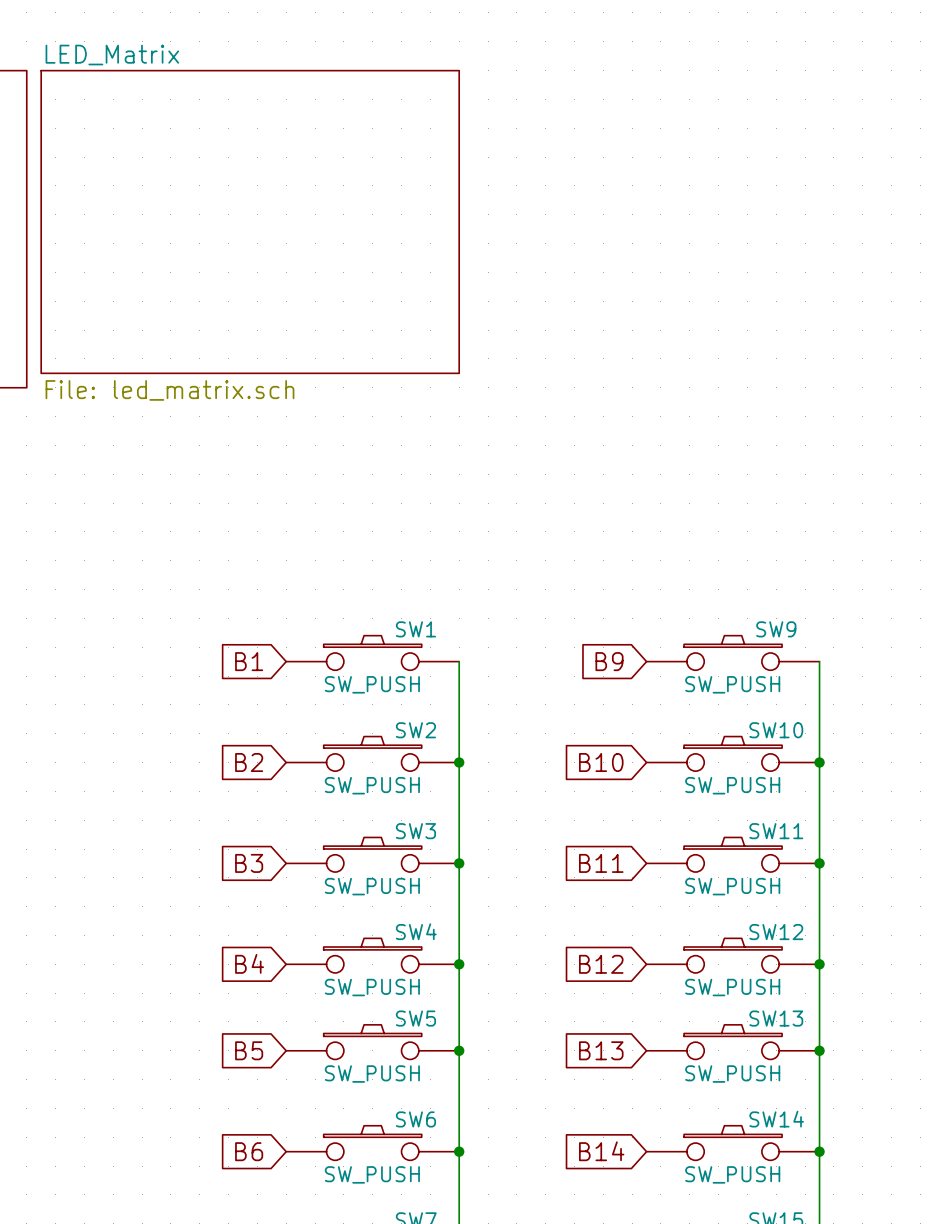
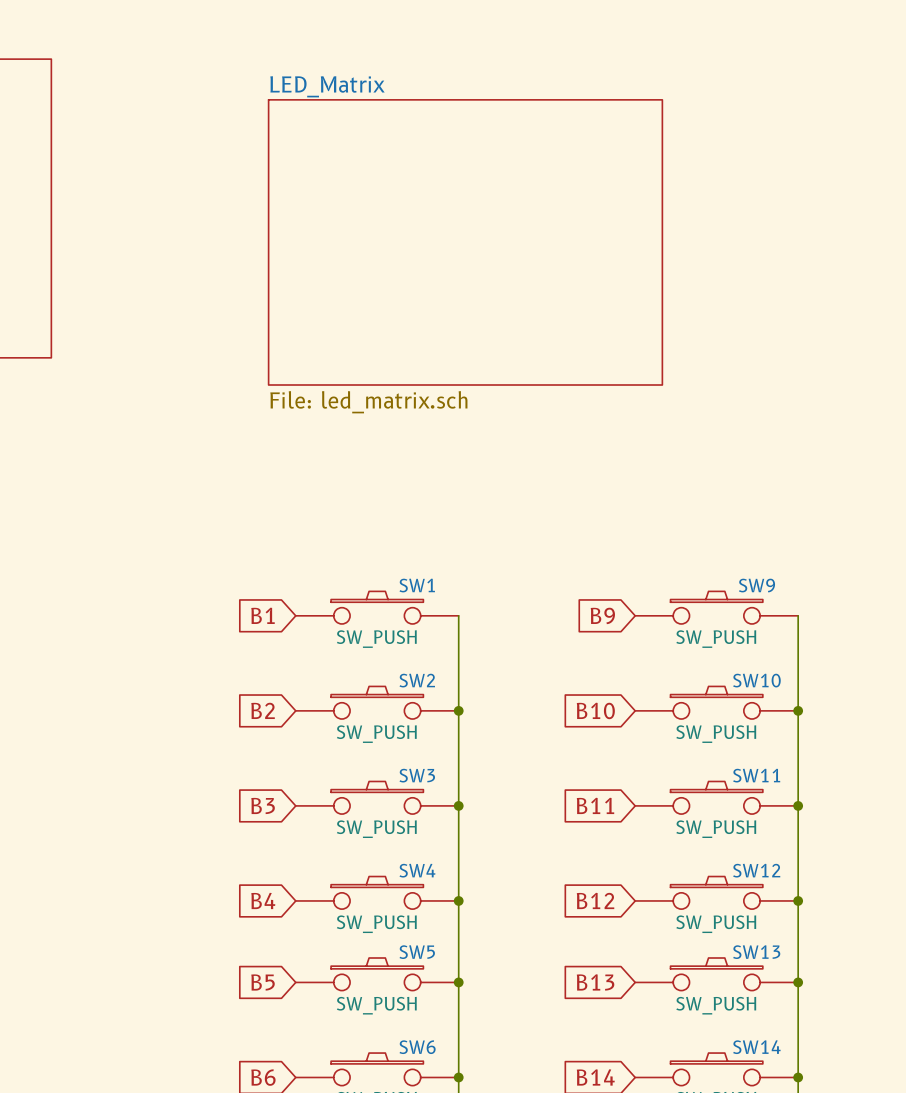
sheet LED_Matrix position: (250, 221) -> (465, 242)

